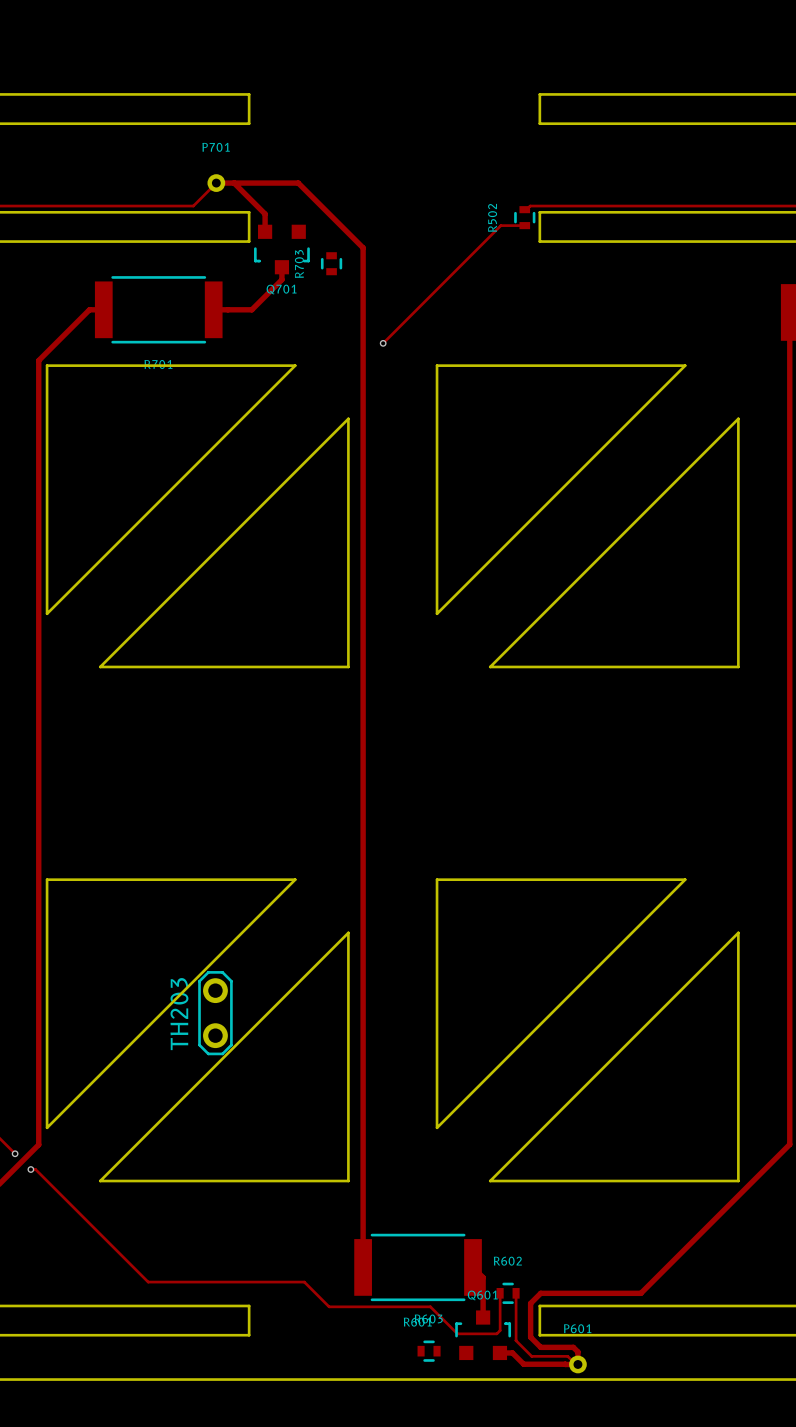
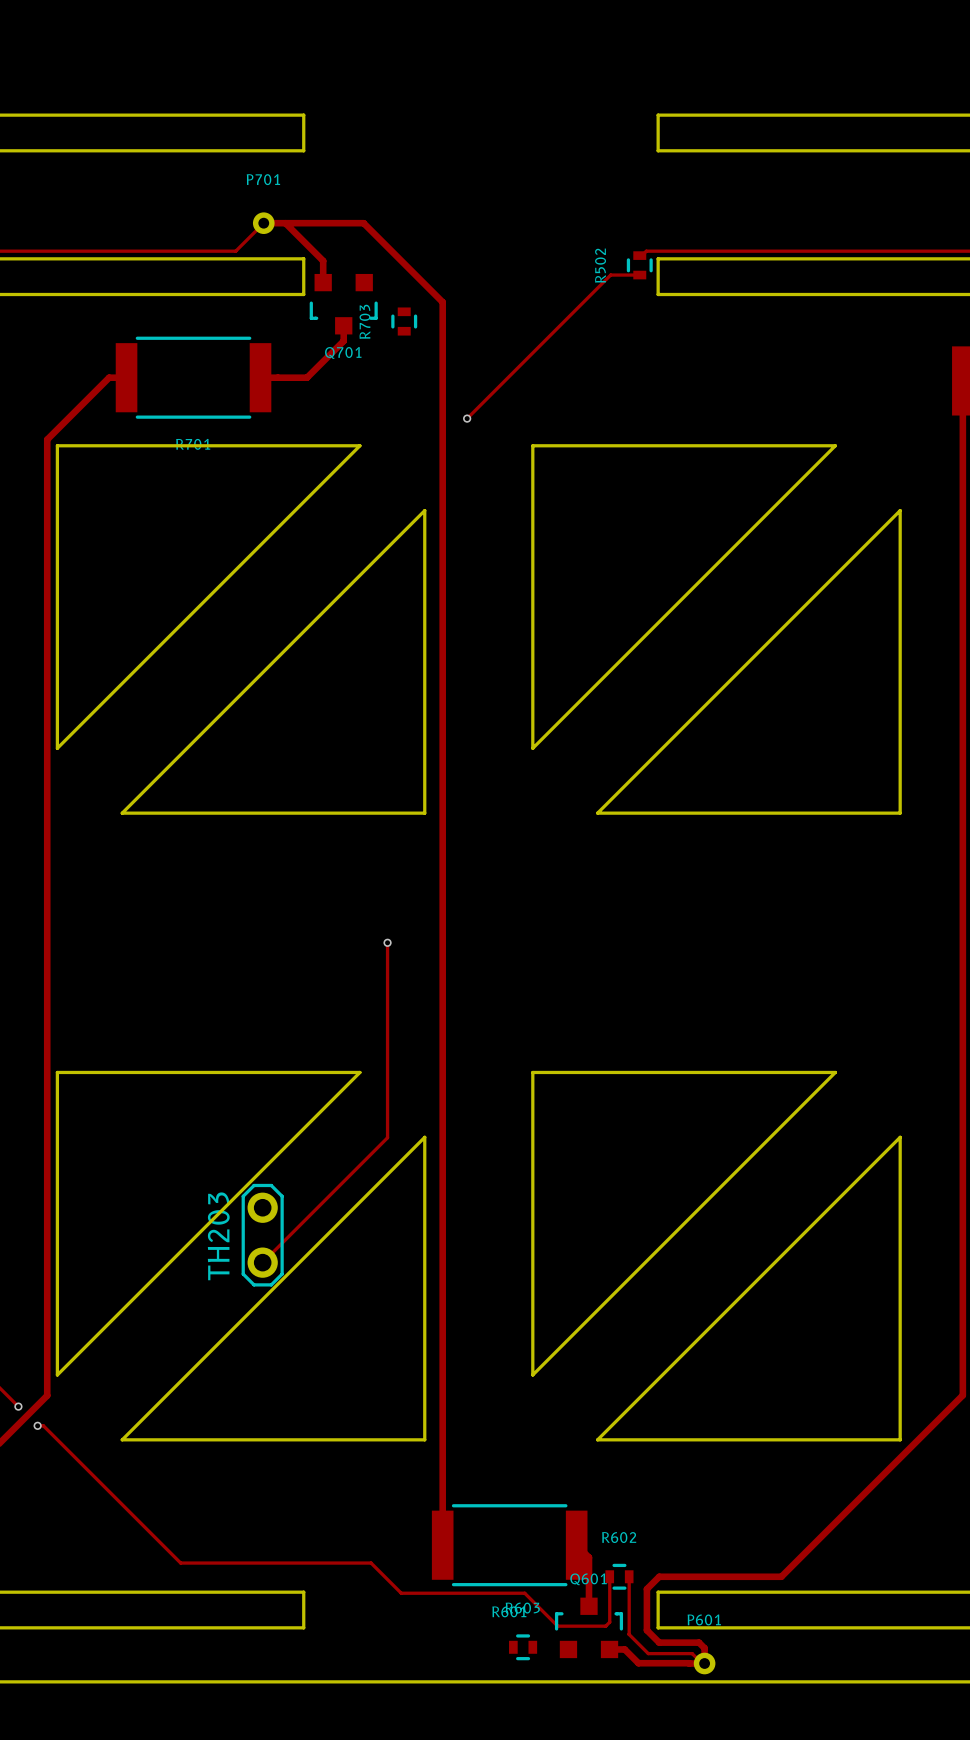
track: none -> (387, 942) (387, 1137) (262, 1262)
via: none -> (387, 942)

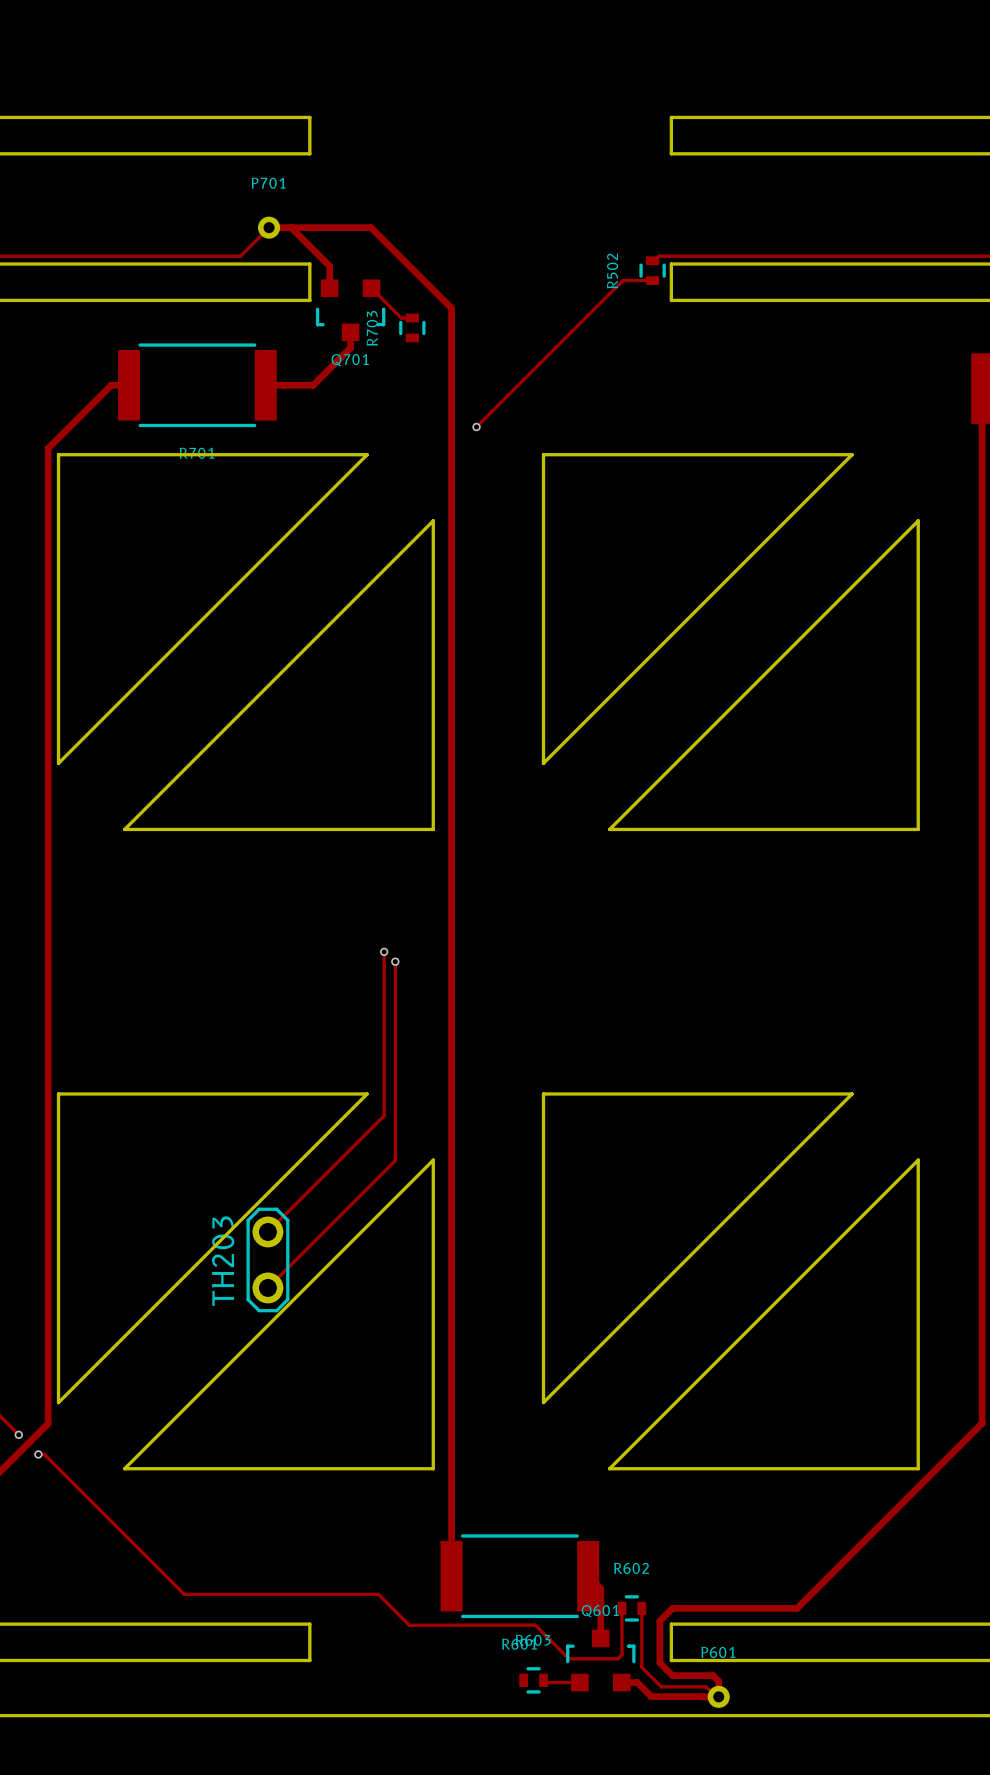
track: none -> (371, 288) (401, 318) (412, 318)
track: none -> (384, 951) (384, 1115) (267, 1231)
via: none -> (384, 951)
track: none -> (543, 1680) (545, 1682) (579, 1682)

